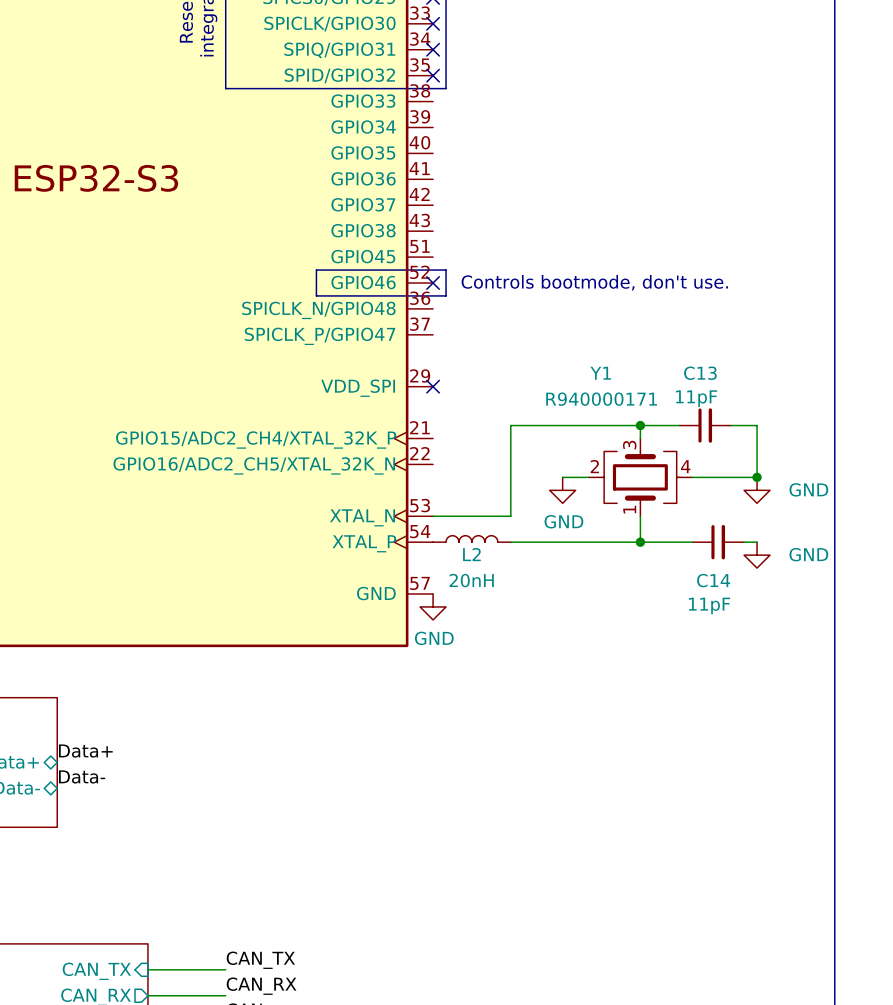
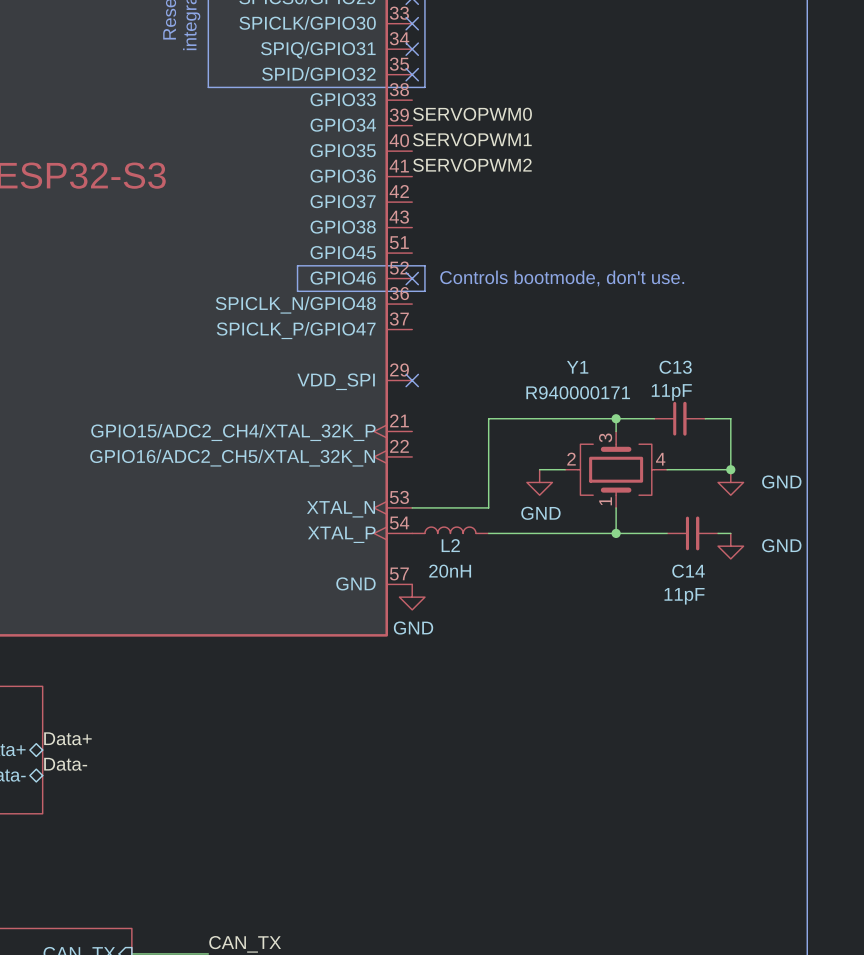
label: none -> SERVOPWM0 (472, 114)
label: none -> SERVOPWM1 (472, 139)
label: none -> SERVOPWM2 (472, 165)

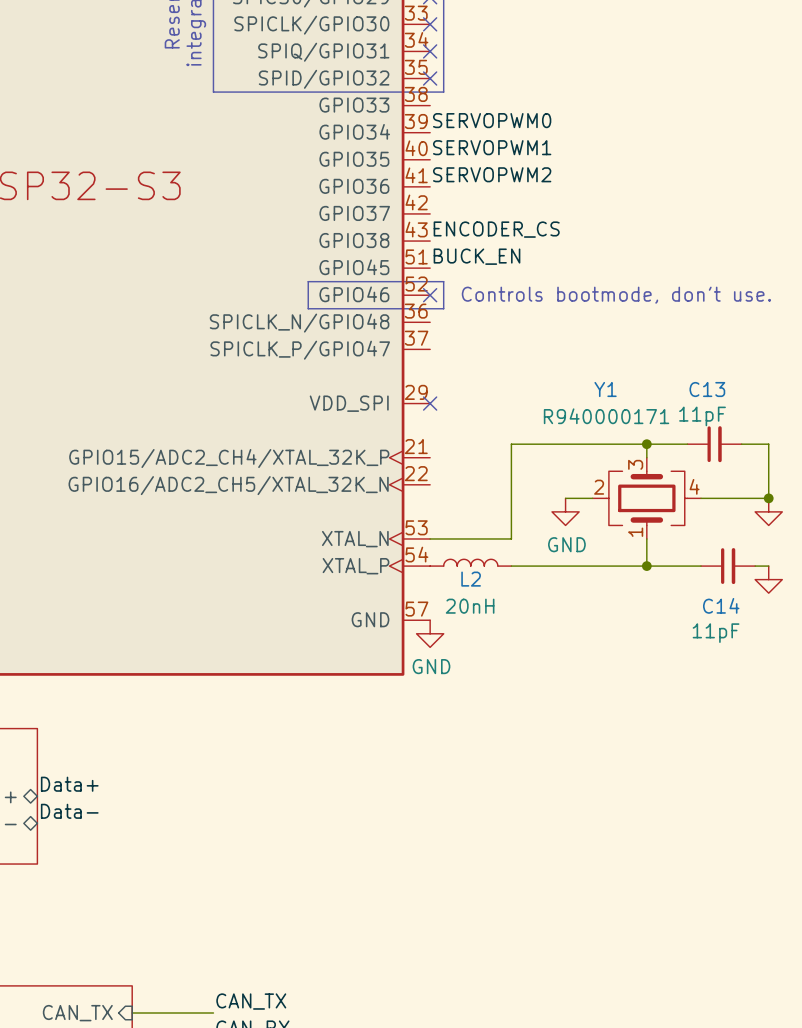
label: none -> ENCODER_CS (496, 229)
label: none -> BUCK_EN (477, 256)

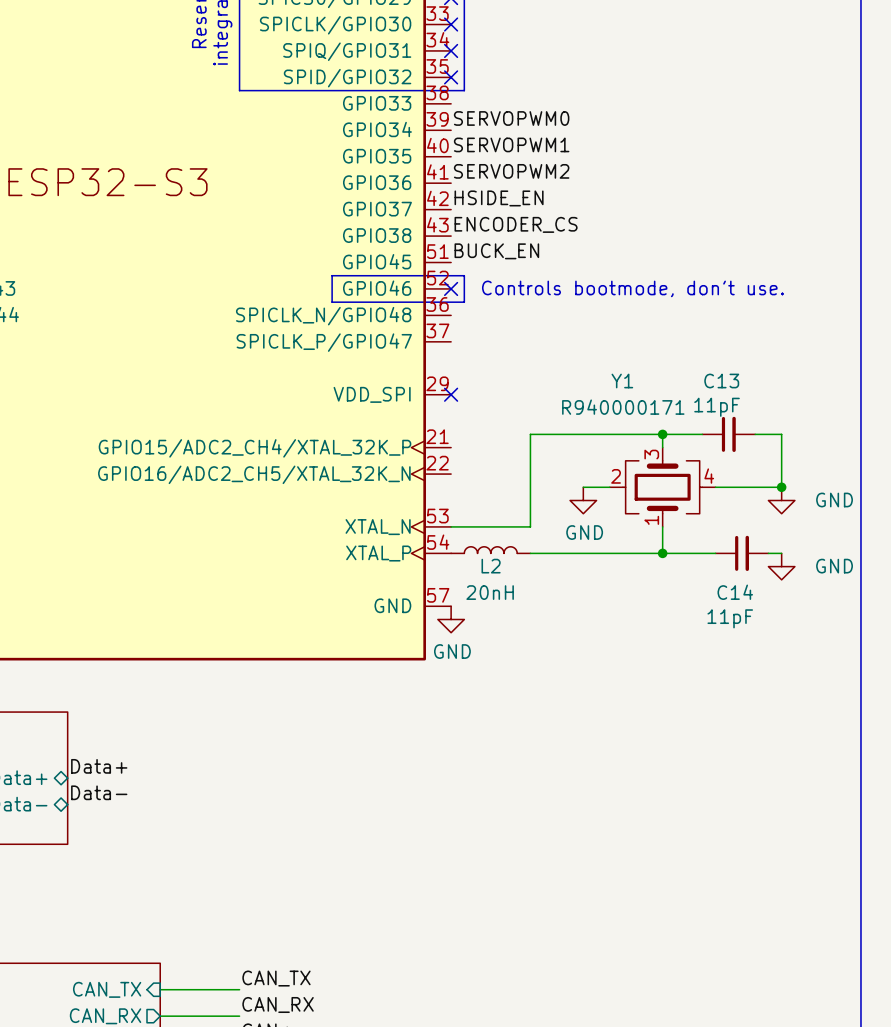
label: none -> HSIDE_EN (499, 198)

